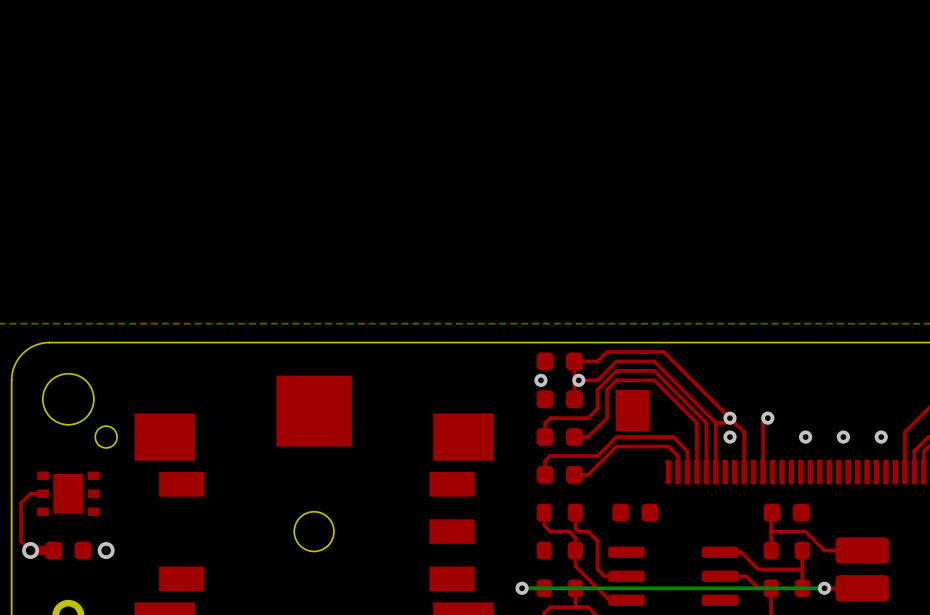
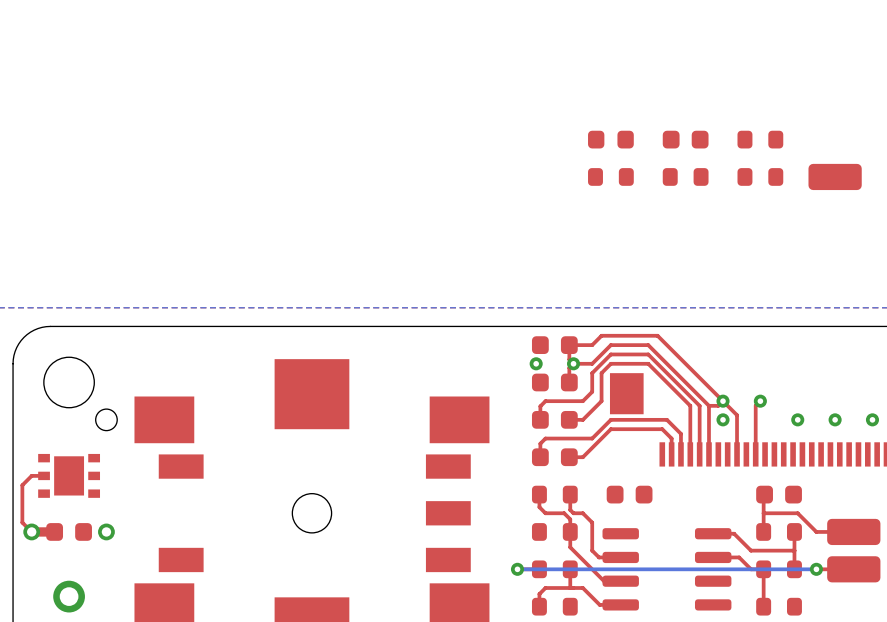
part: none -> (610, 139)
part: none -> (685, 139)
part: none -> (760, 139)
part: none -> (610, 176)
part: none -> (685, 176)
part: none -> (760, 176)
part: none -> (835, 176)

